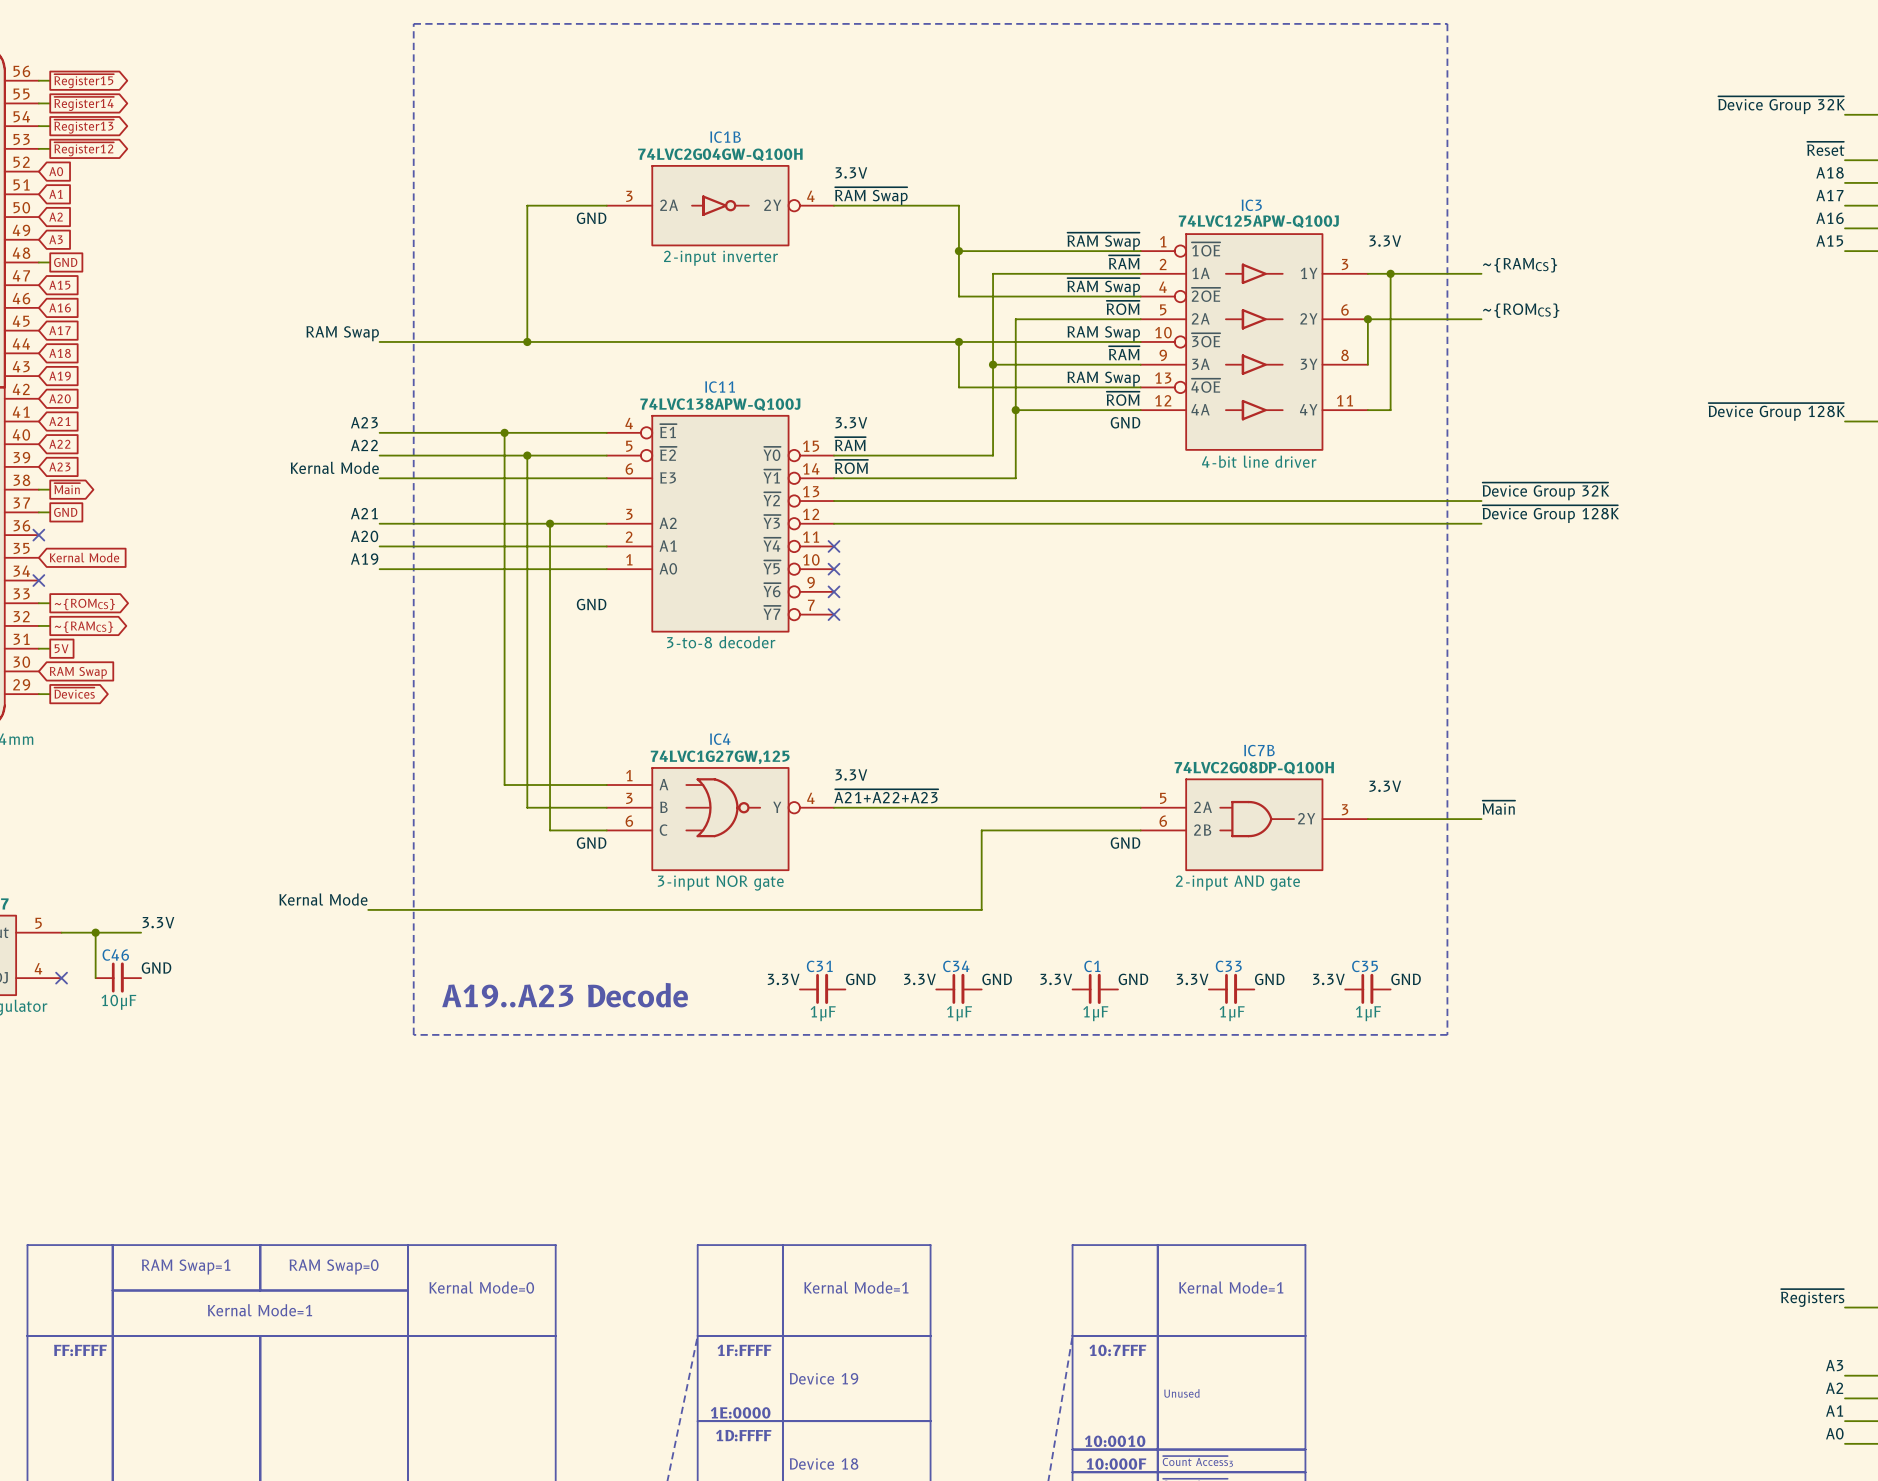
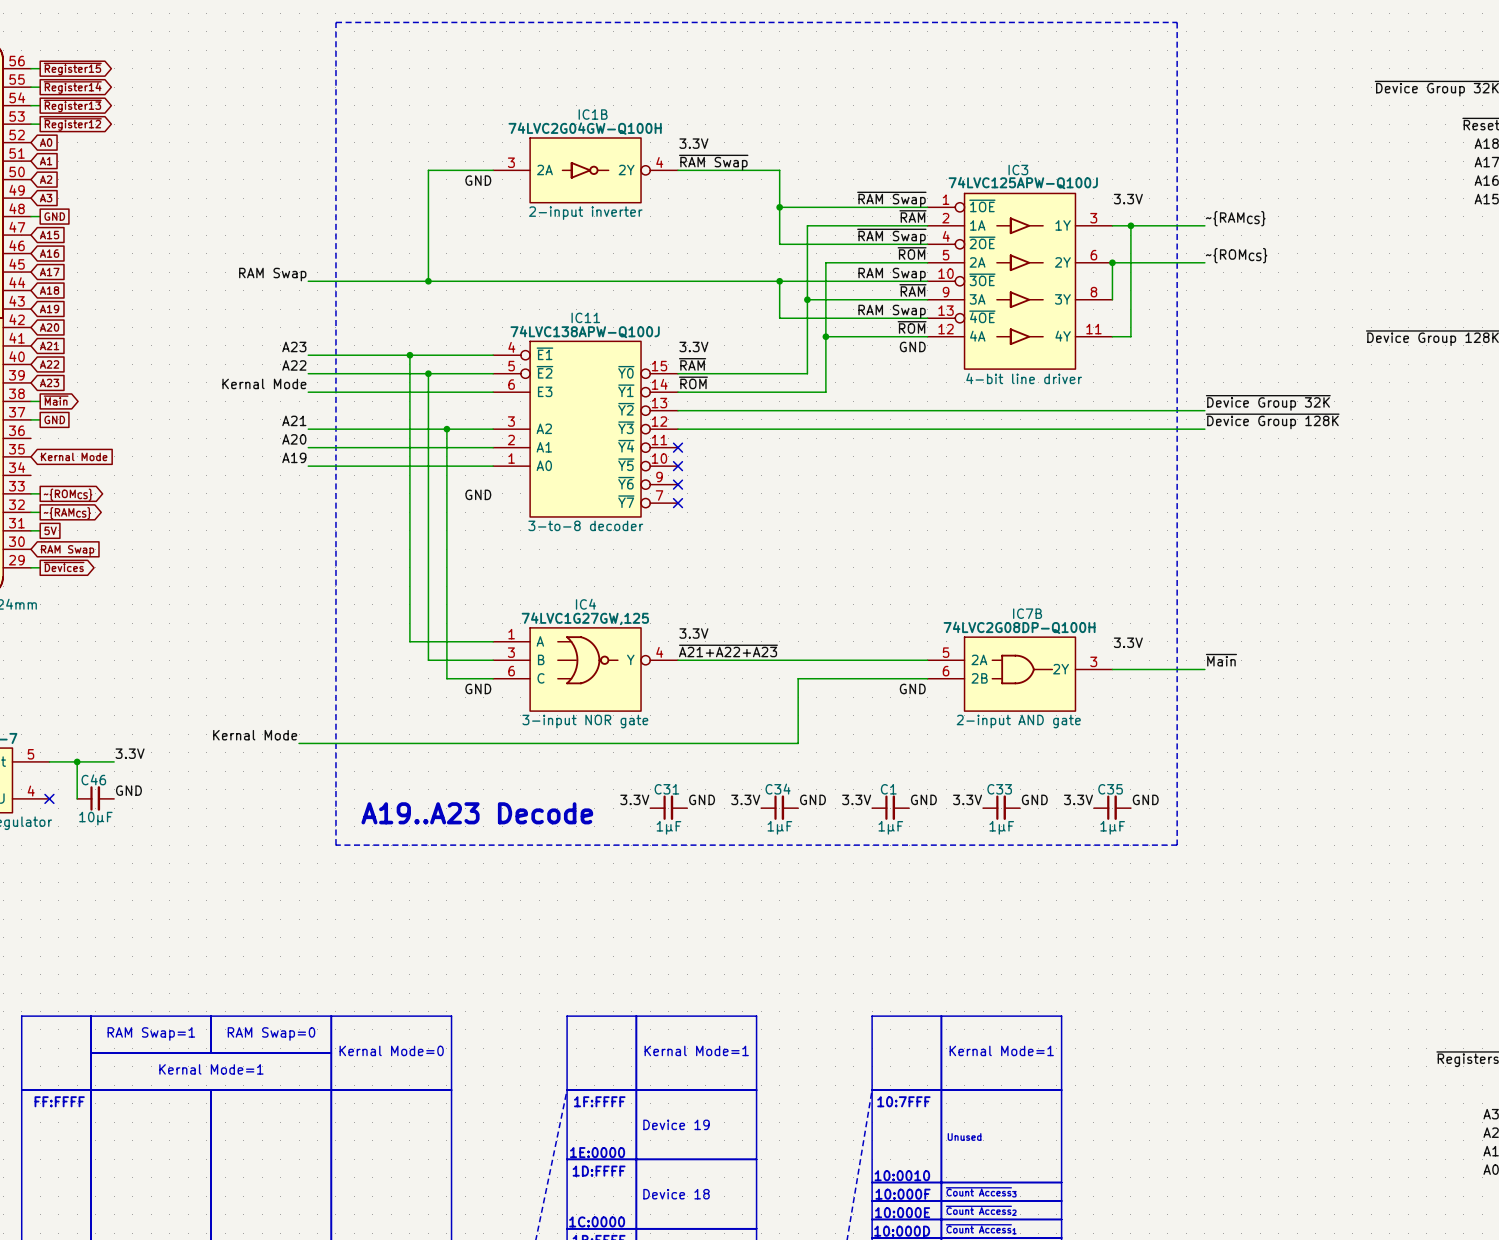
no-connect mark: (38, 535) -> none
no-connect mark: (38, 580) -> none

